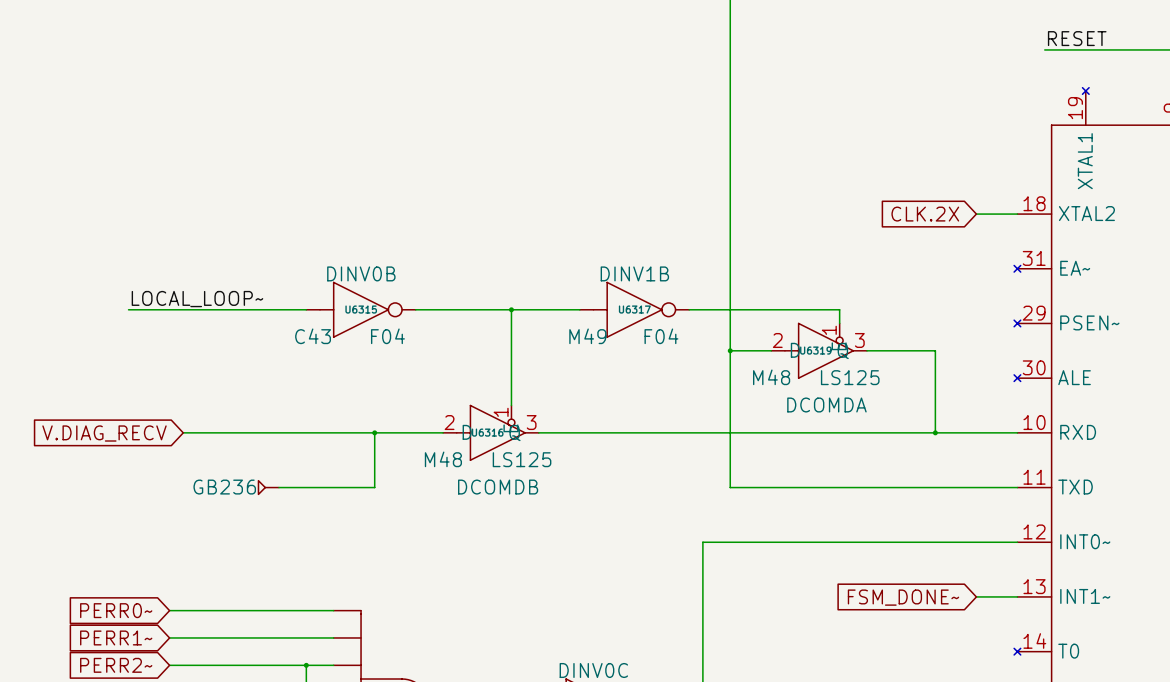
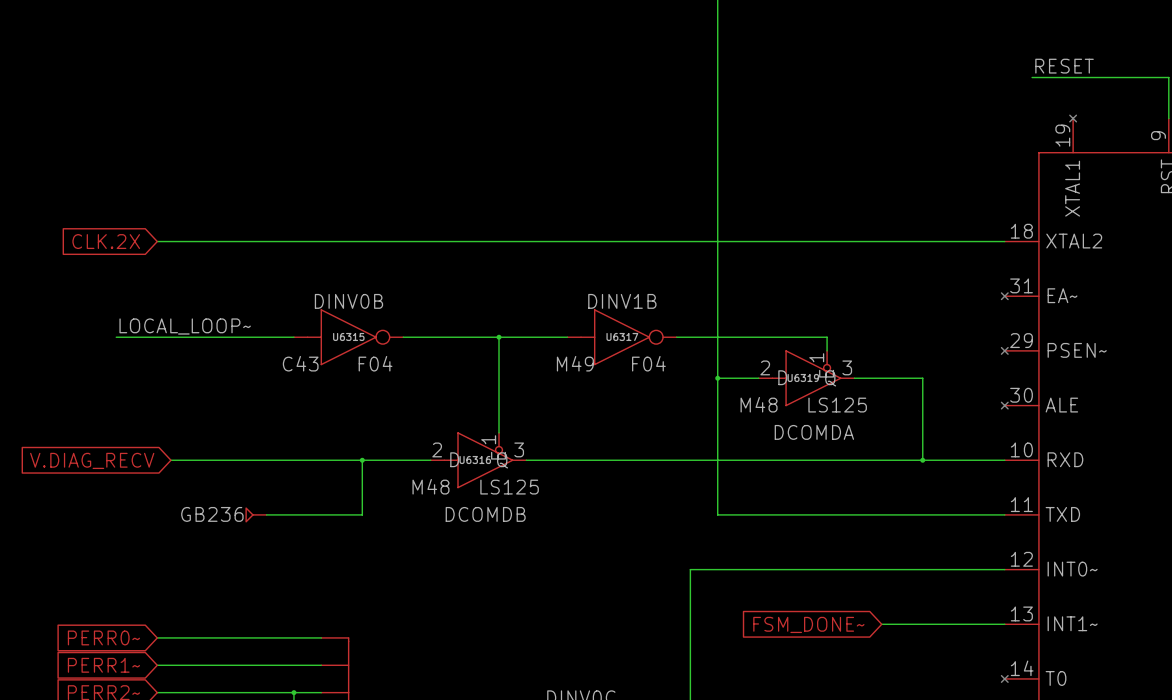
global label: none -> CLK.2X (106, 241)
wire: none -> (157, 241) (963, 241)
global label: CLK.2X (925, 214) -> none
wire: none -> (881, 624) (963, 624)
global label position: FSM_DONE~ (903, 597) -> FSM_DONE~ (808, 624)

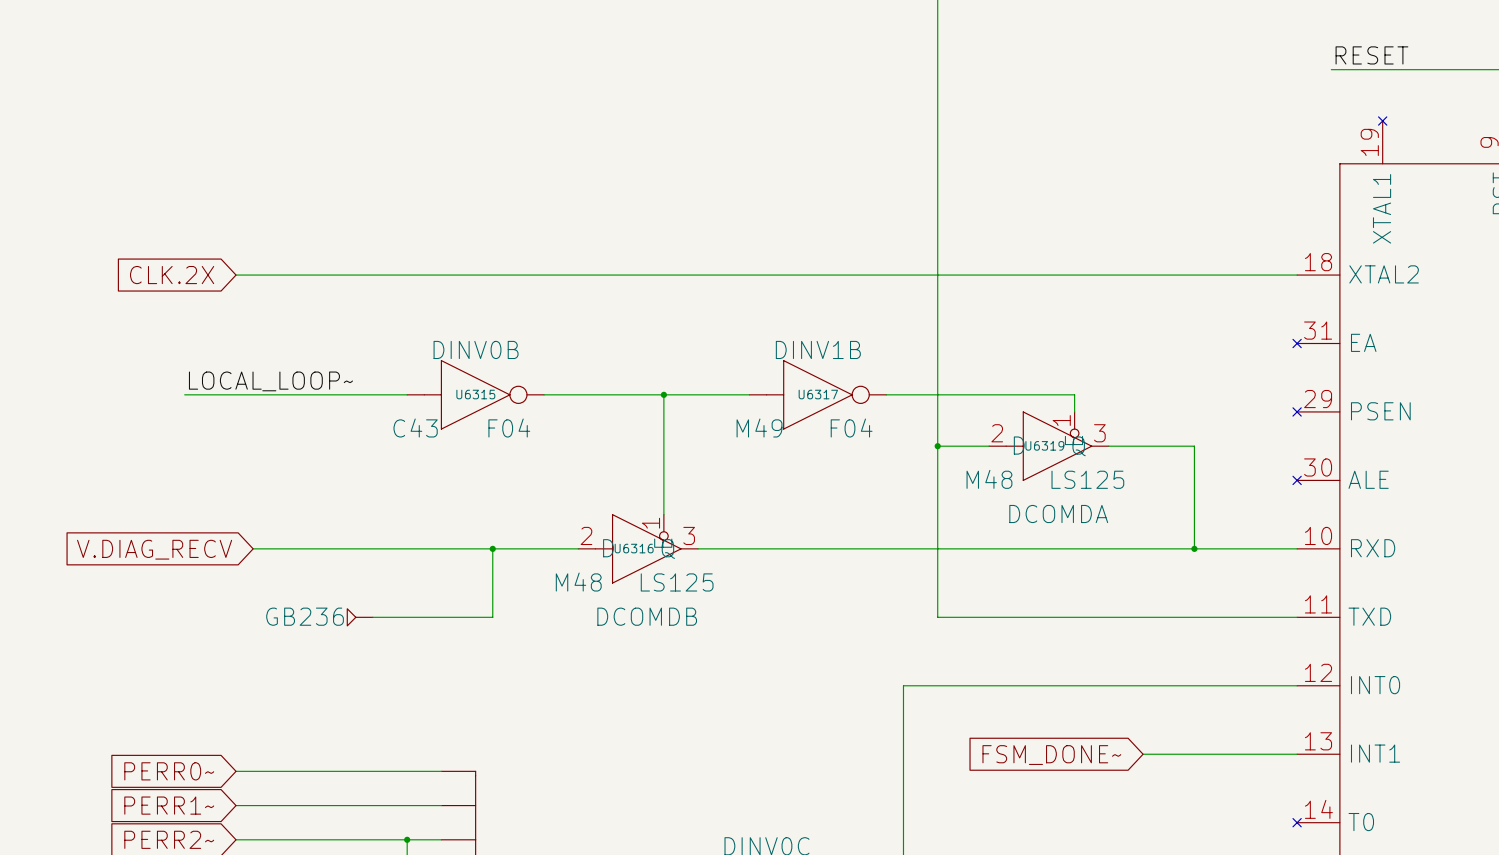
part pin name: EA~ (1062, 295) -> EA (1363, 342)
part pin name: PSEN~ (1077, 350) -> PSEN (1380, 411)
part pin name: INT0~ (1072, 569) -> INT0 (1375, 685)
part pin name: INT1~ (1072, 623) -> INT1 (1375, 753)

